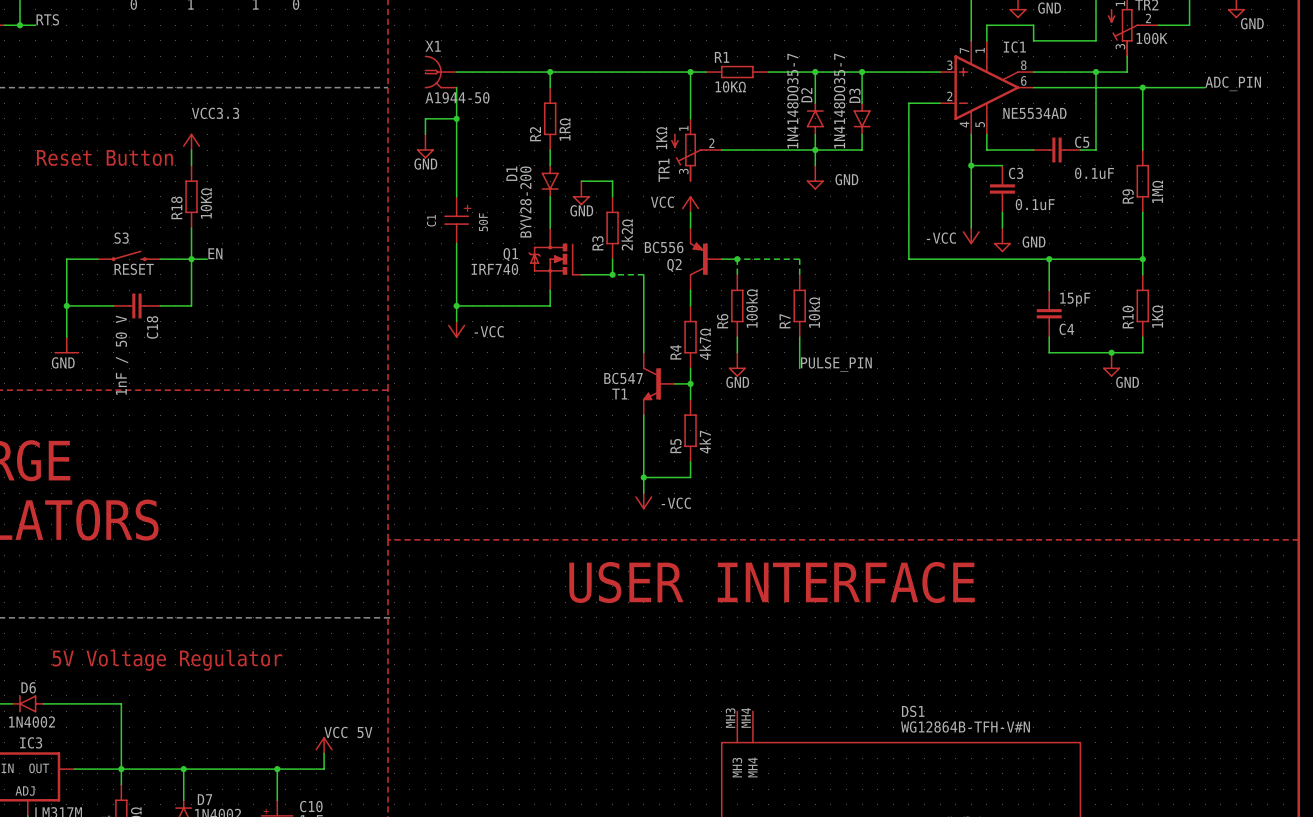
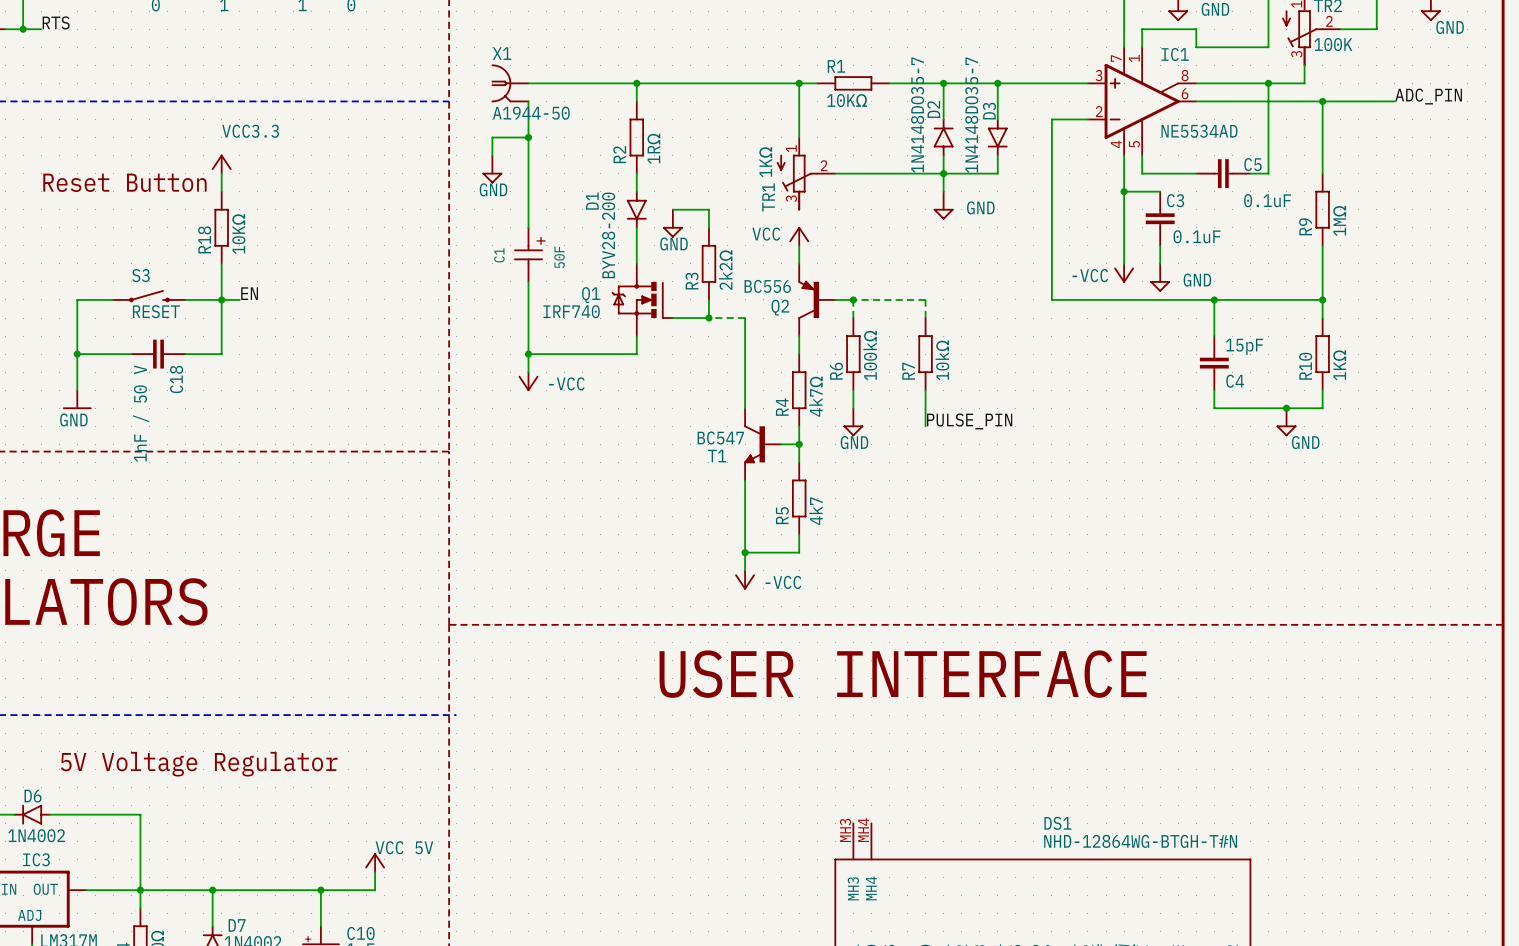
DS1 value: WG12864B-TFH-V#N (965, 727) -> NHD-12864WG-BTGH-T#N (1140, 841)

